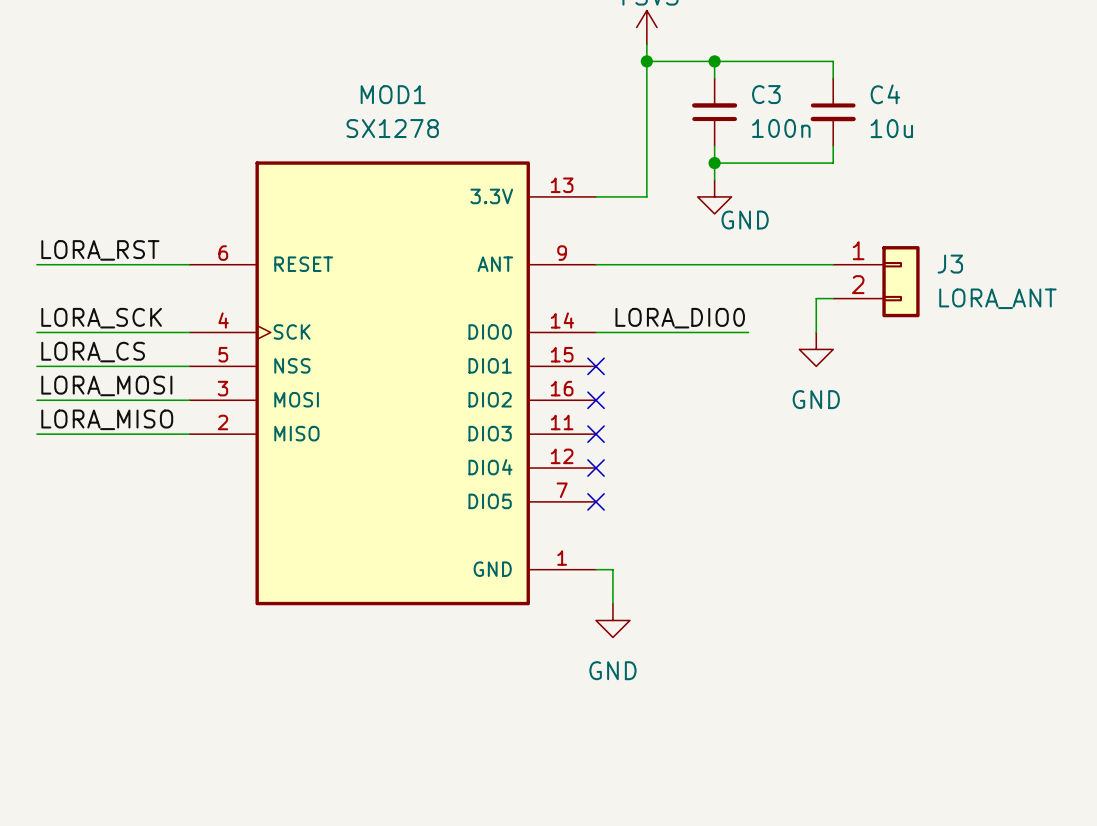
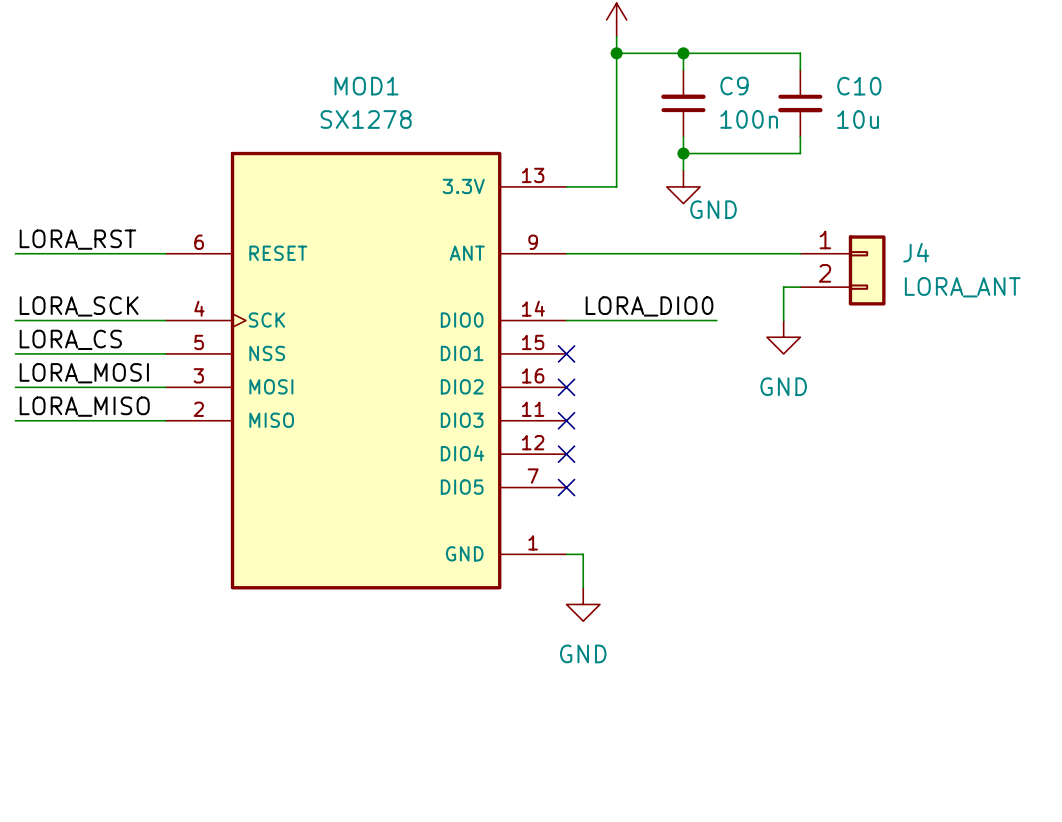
C3 name: C3 (766, 94) -> C9 (734, 86)
C4 name: C4 (885, 94) -> C10 (859, 86)
J3 name: J3 (950, 264) -> J4 (916, 252)

